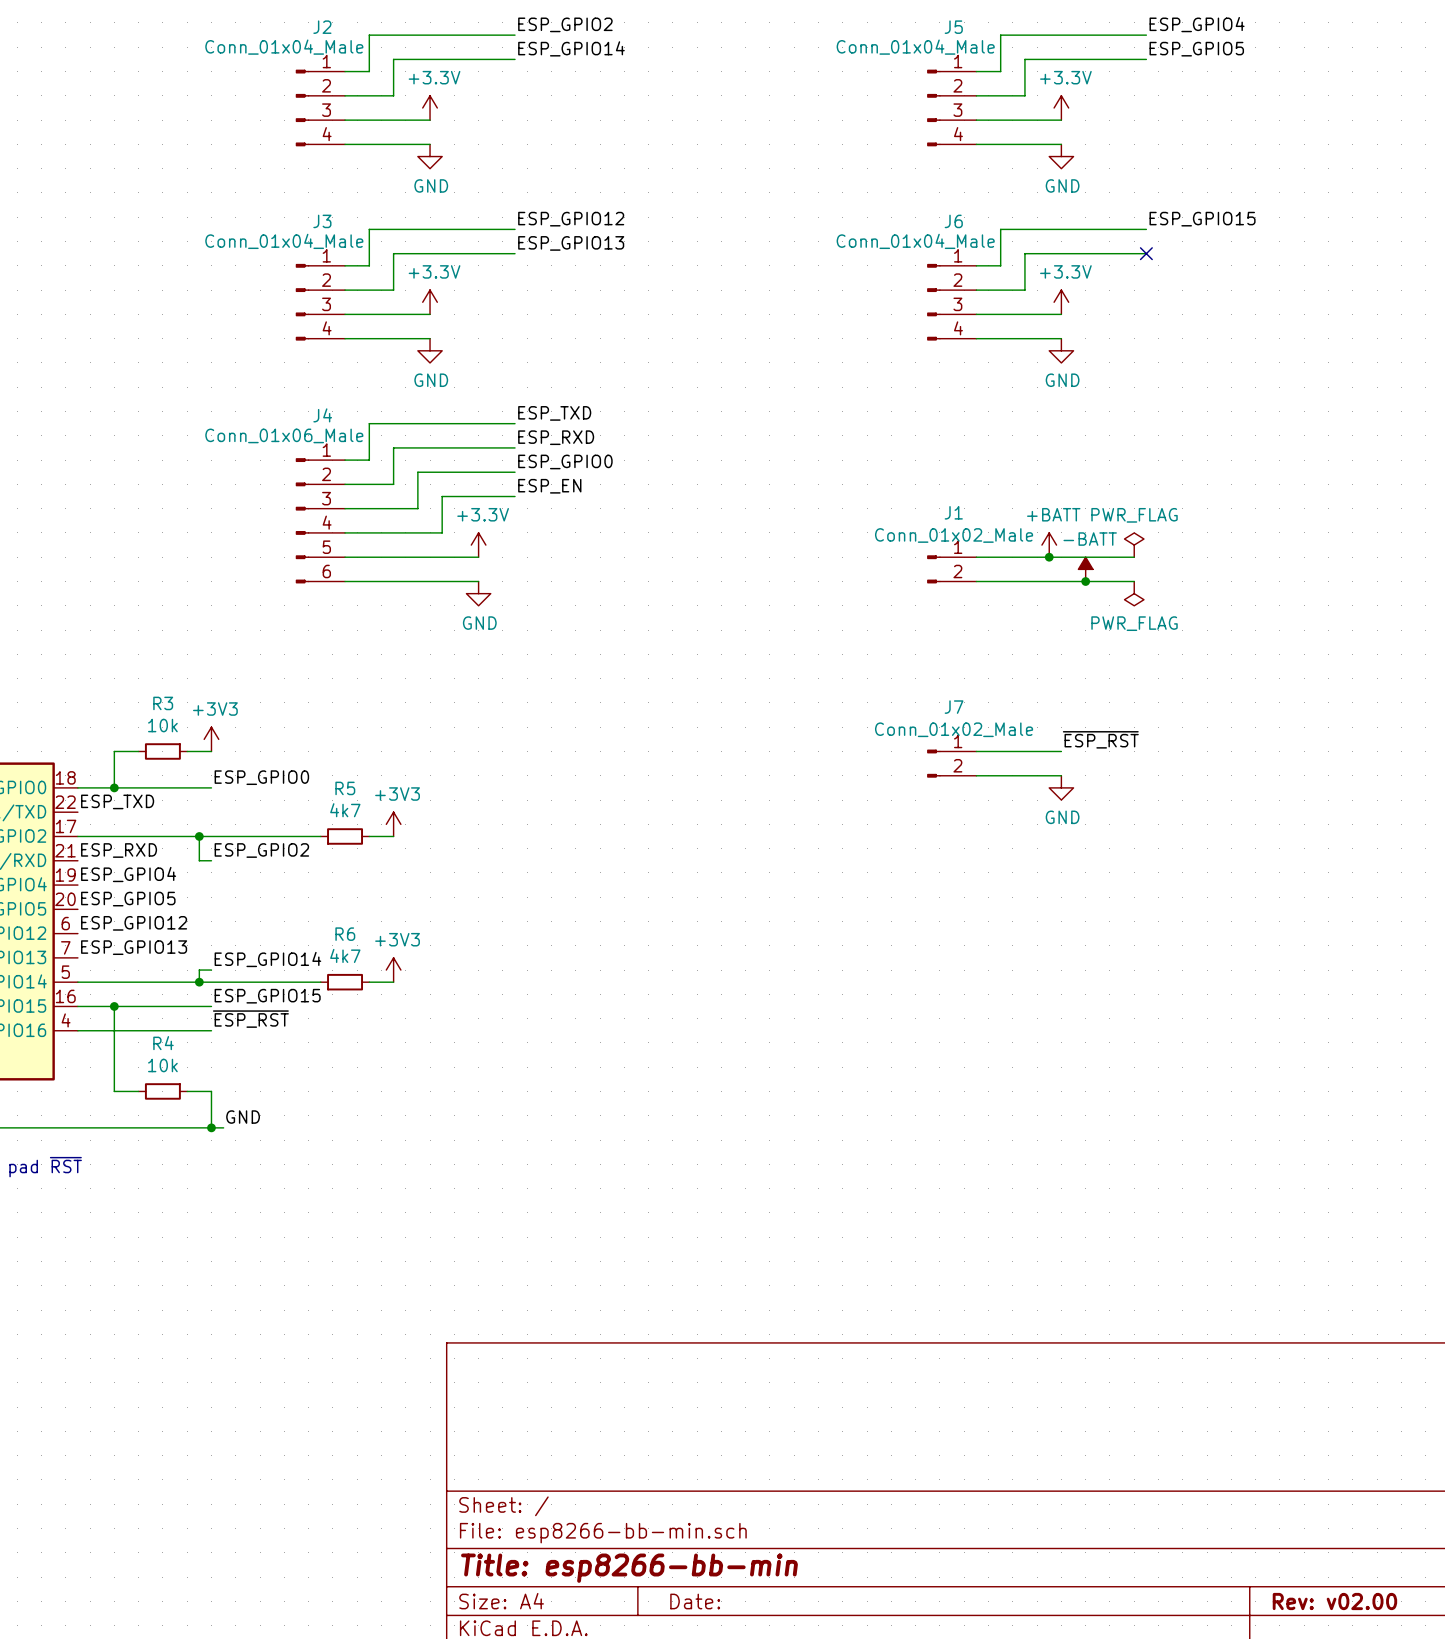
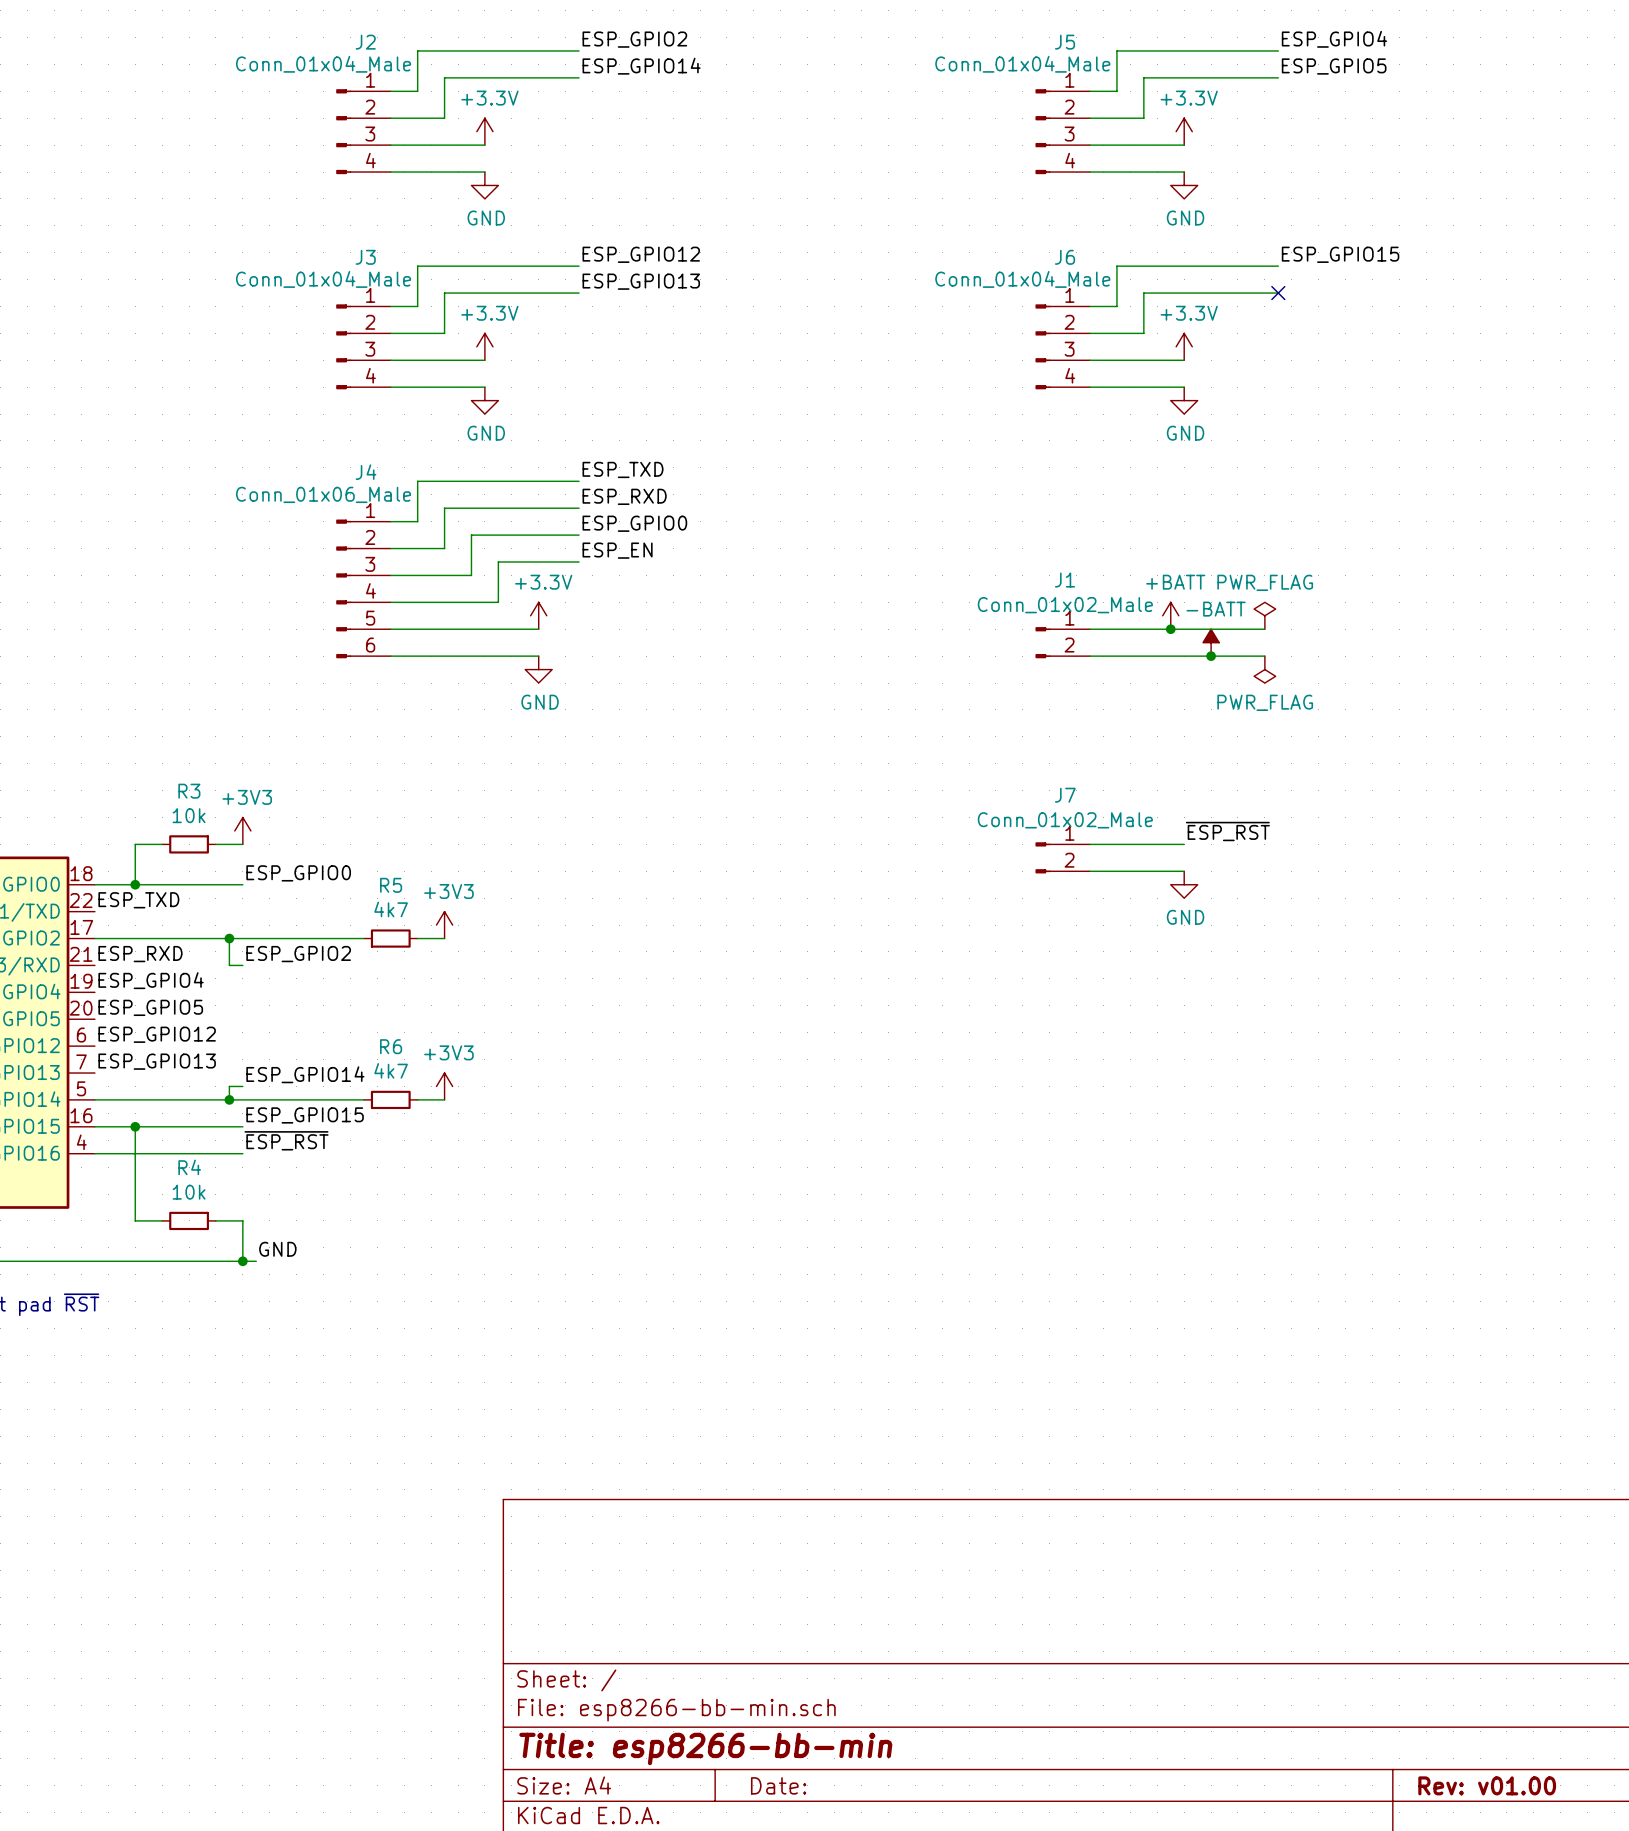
title block: Rev: v02.00 (1334, 1601) -> Rev: v01.00 (1487, 1785)

